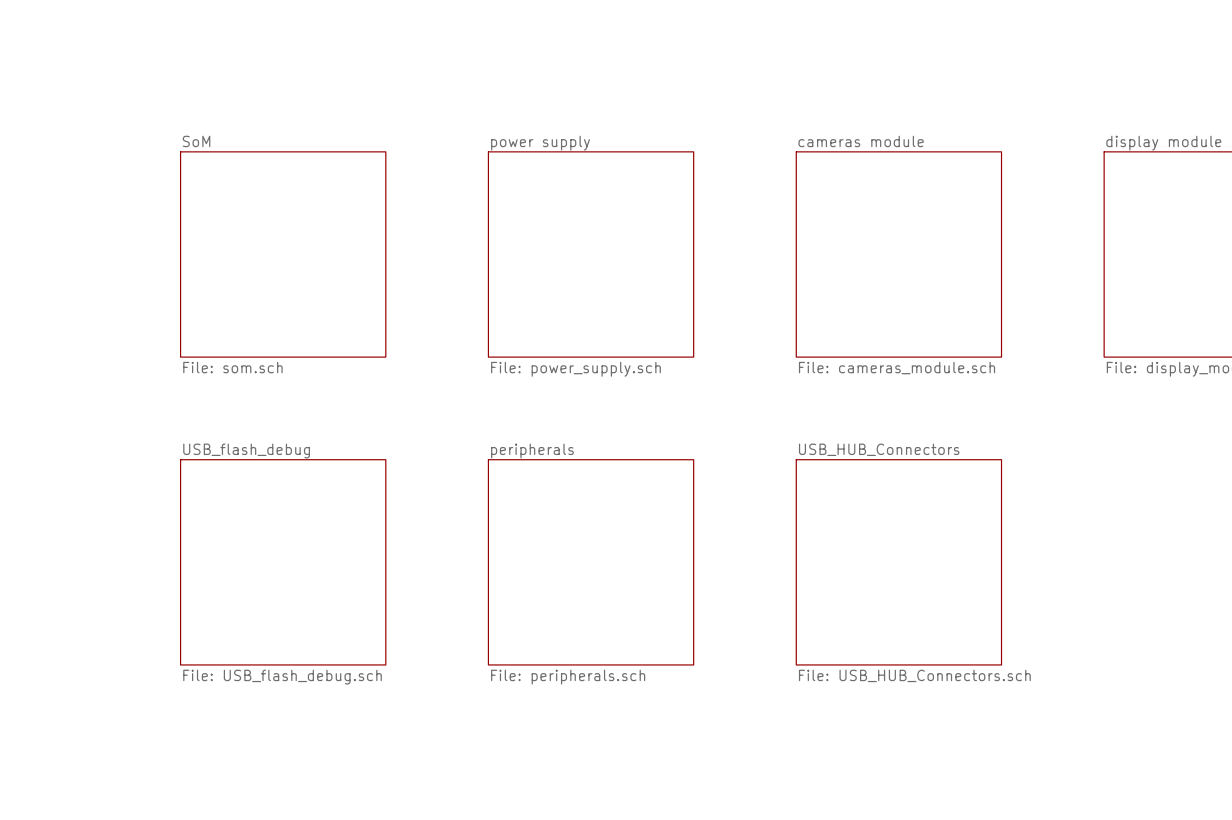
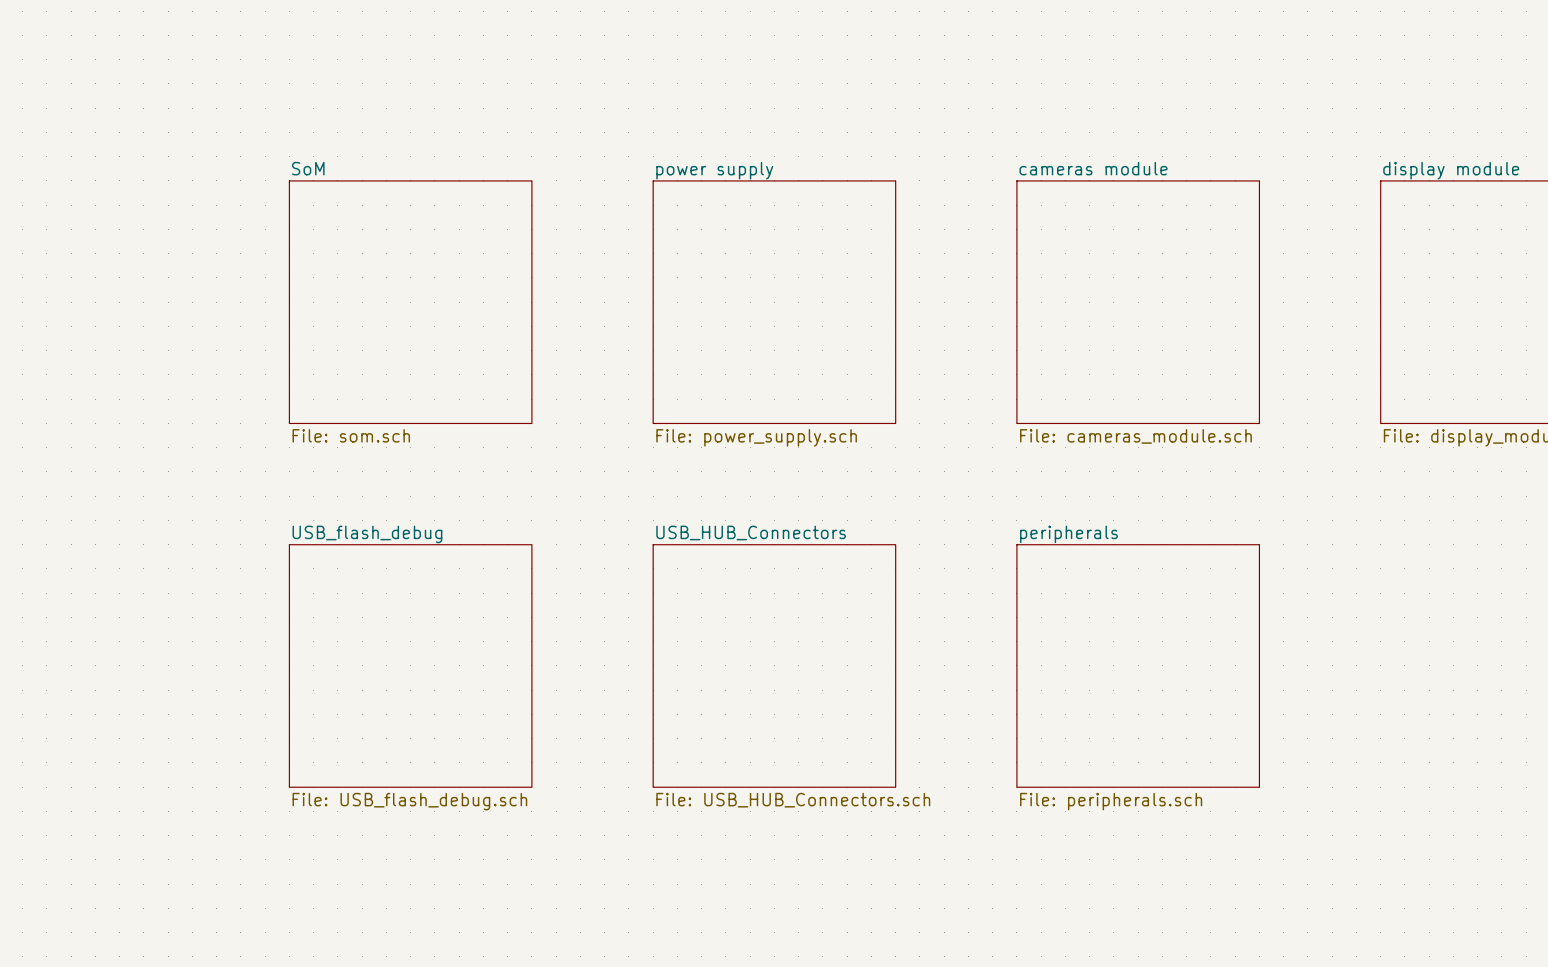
sheet USB_HUB_Connectors name: USB_HUB_Connectors (879, 449) -> peripherals (1068, 534)
sheet peripherals name: peripherals (532, 451) -> USB_HUB_Connectors (751, 532)
sheet USB_HUB_Connectors value: File: USB_HUB_Connectors.sch (914, 675) -> File: peripherals.sch (1111, 801)
sheet peripherals value: File: peripherals.sch (568, 677) -> File: USB_HUB_Connectors.sch (793, 800)

